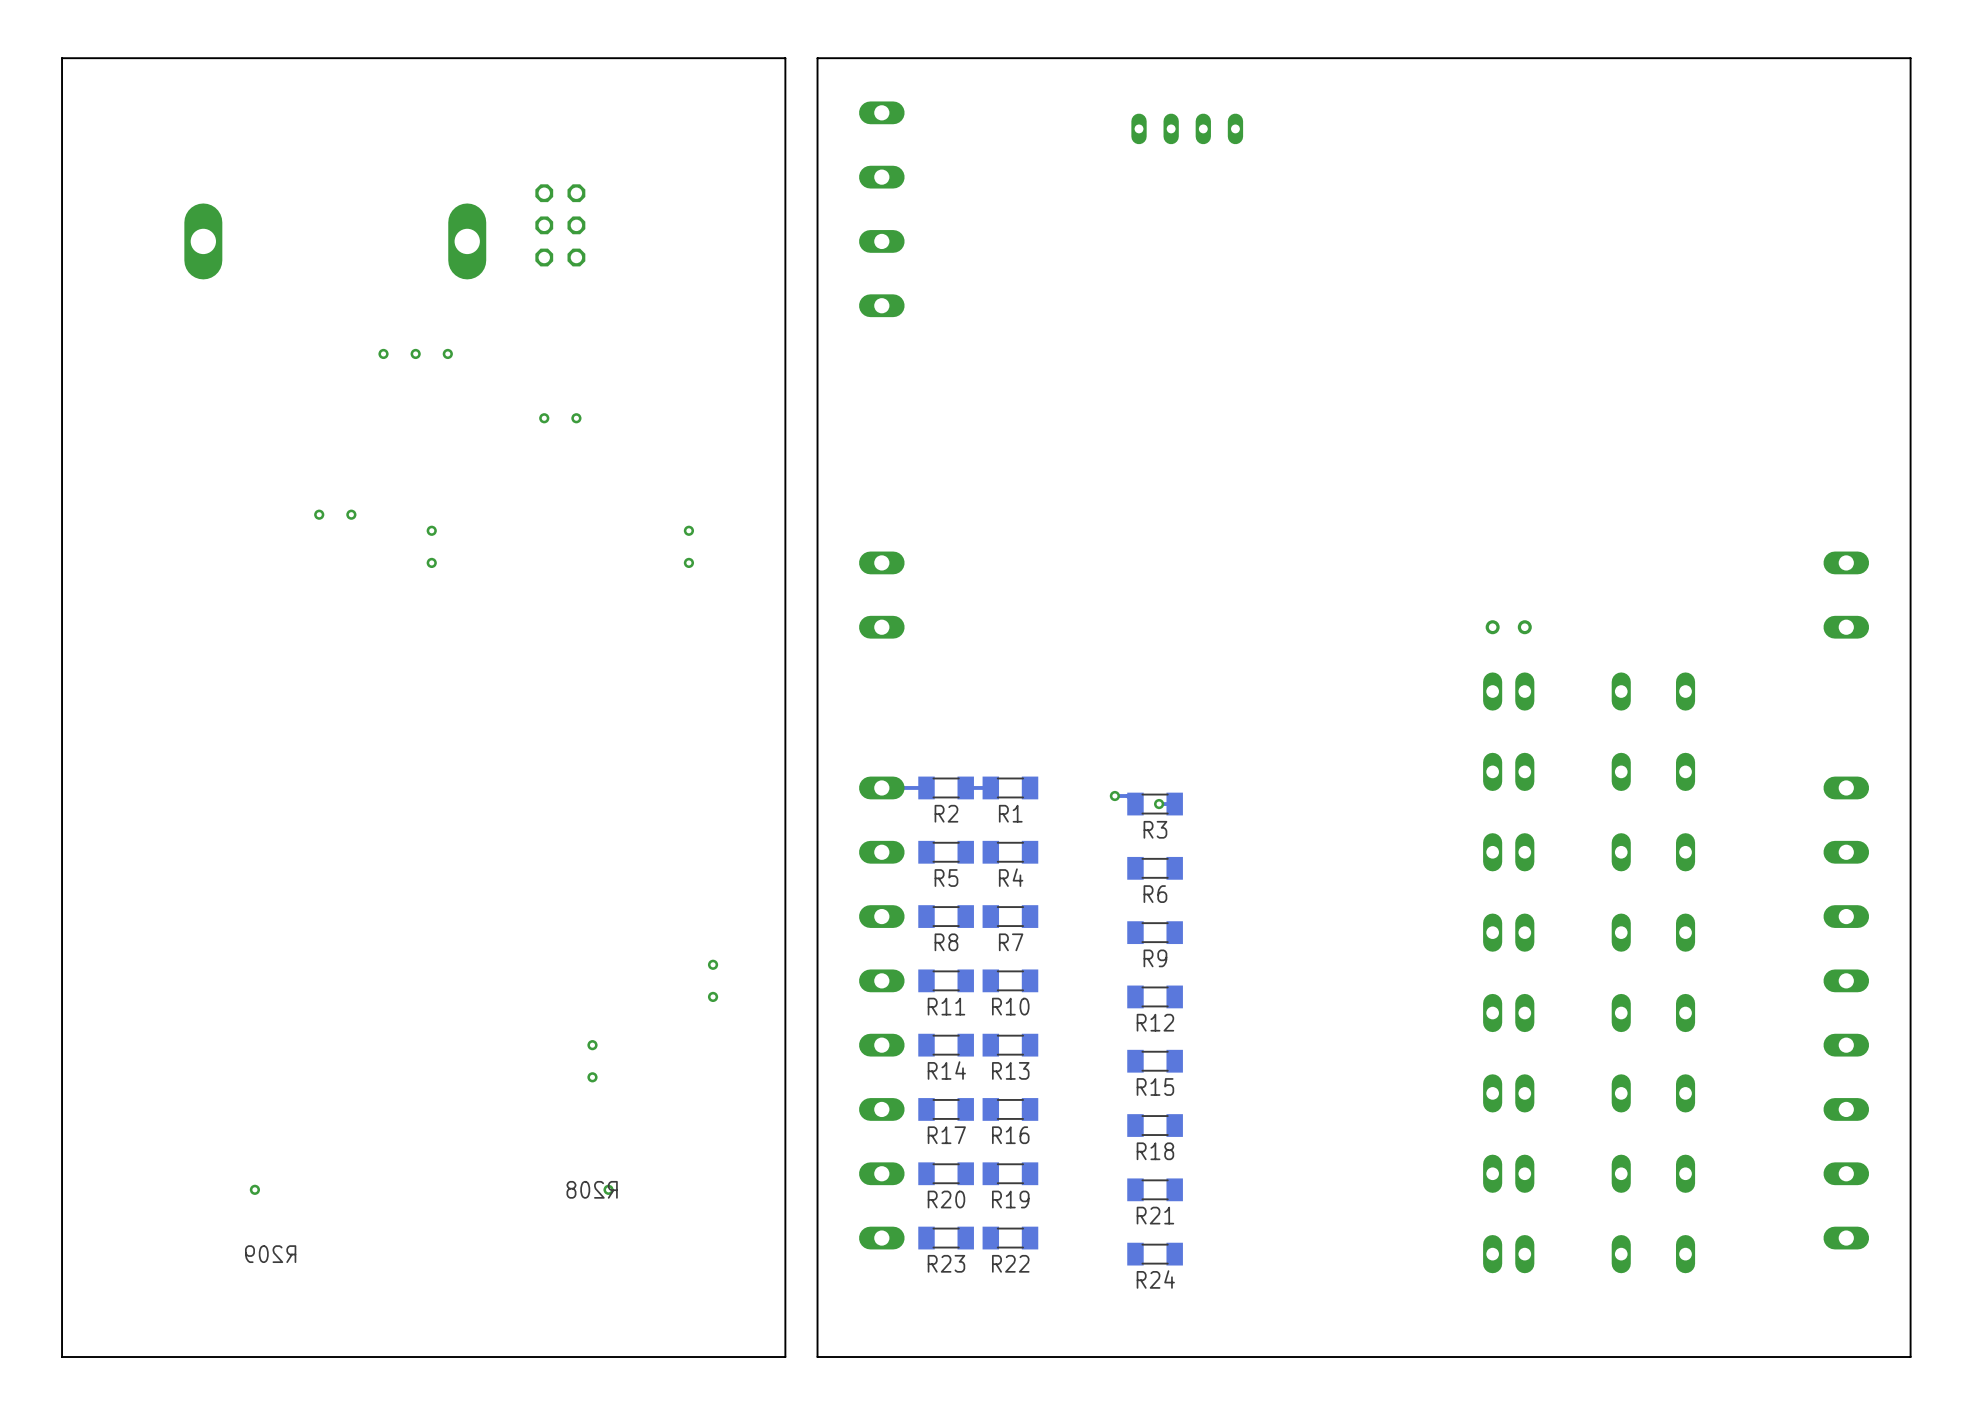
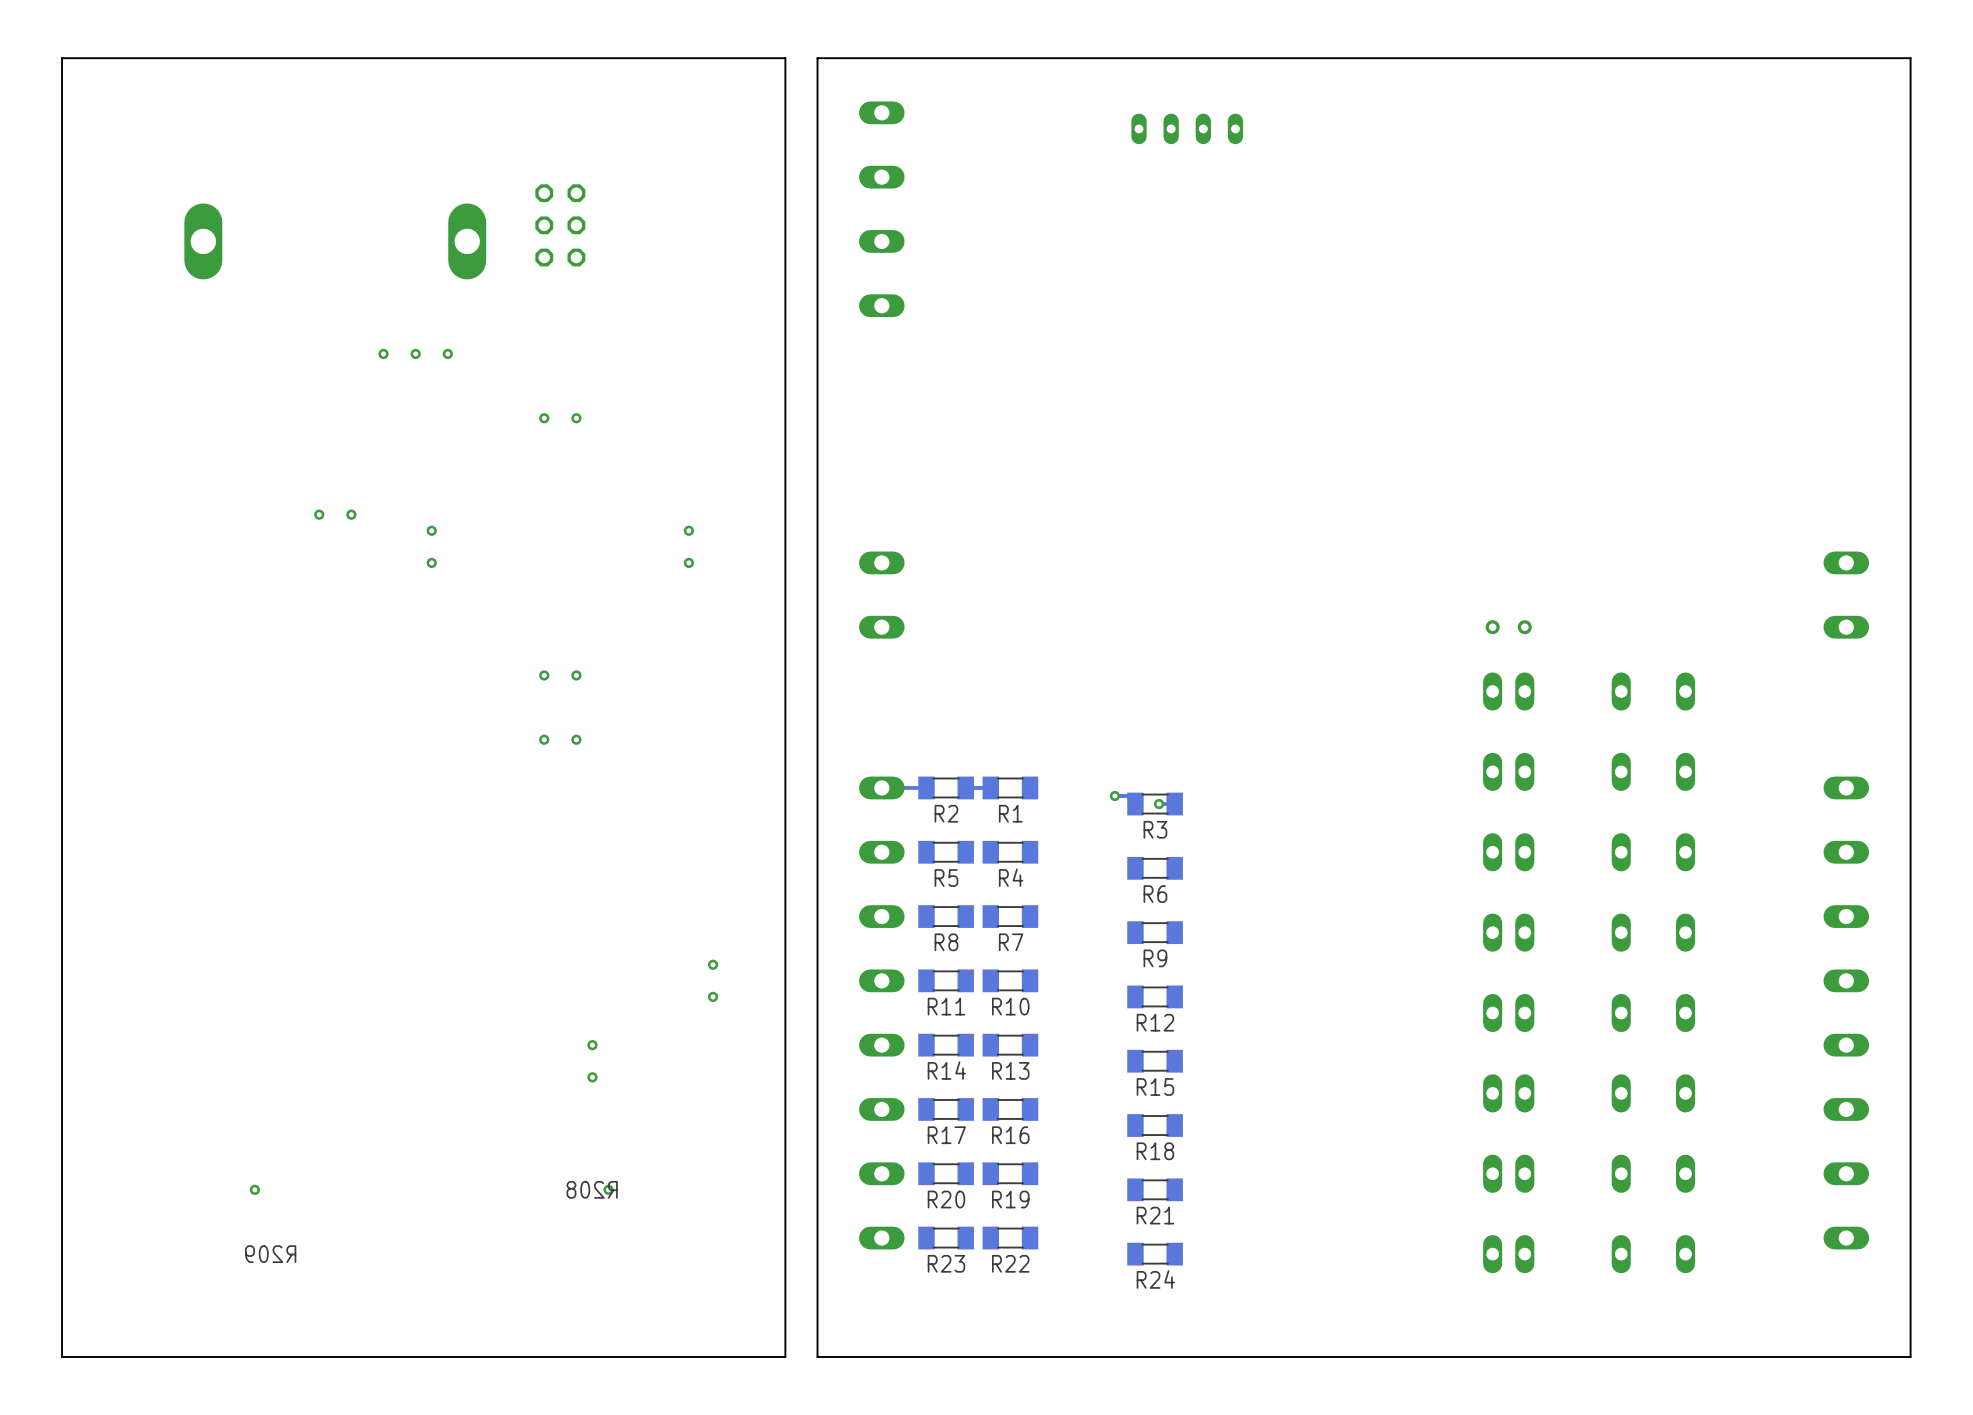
via: none -> (544, 675)
via: none -> (576, 675)
via: none -> (544, 739)
via: none -> (576, 739)

